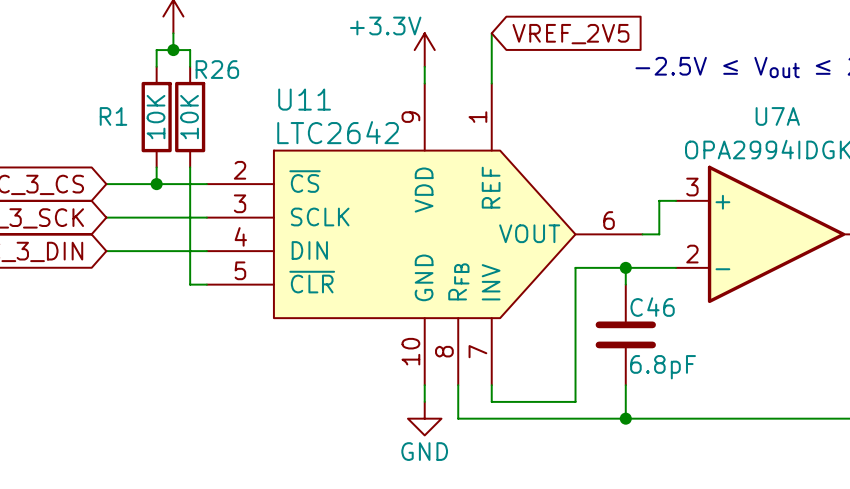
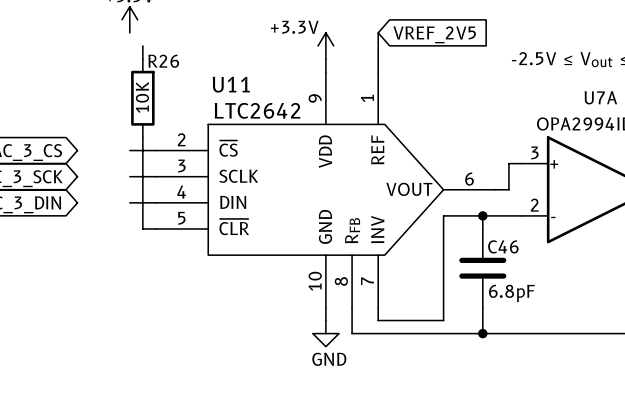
wire: (173, 33) (173, 50) -> none
junction: (173, 50) -> none
wire: (190, 50) (156, 50) (156, 66) -> none
R1: 10K (156, 117) -> none
wire: (156, 167) (156, 184) -> none
wire: (106, 184) (173, 184) -> none
junction: (156, 184) -> none
wire: (106, 217) (173, 217) -> none
wire: (106, 251) (173, 251) -> none

